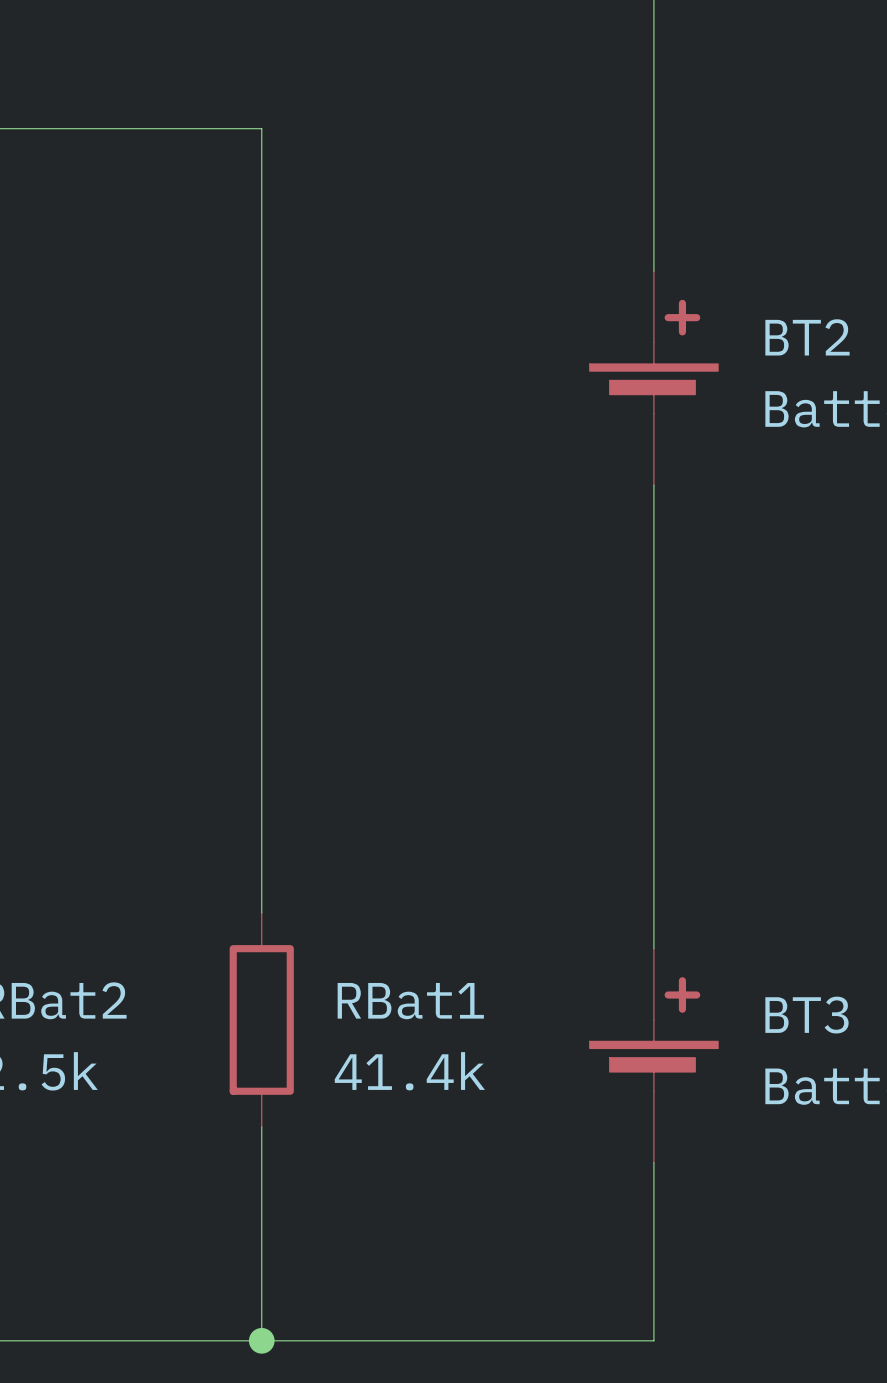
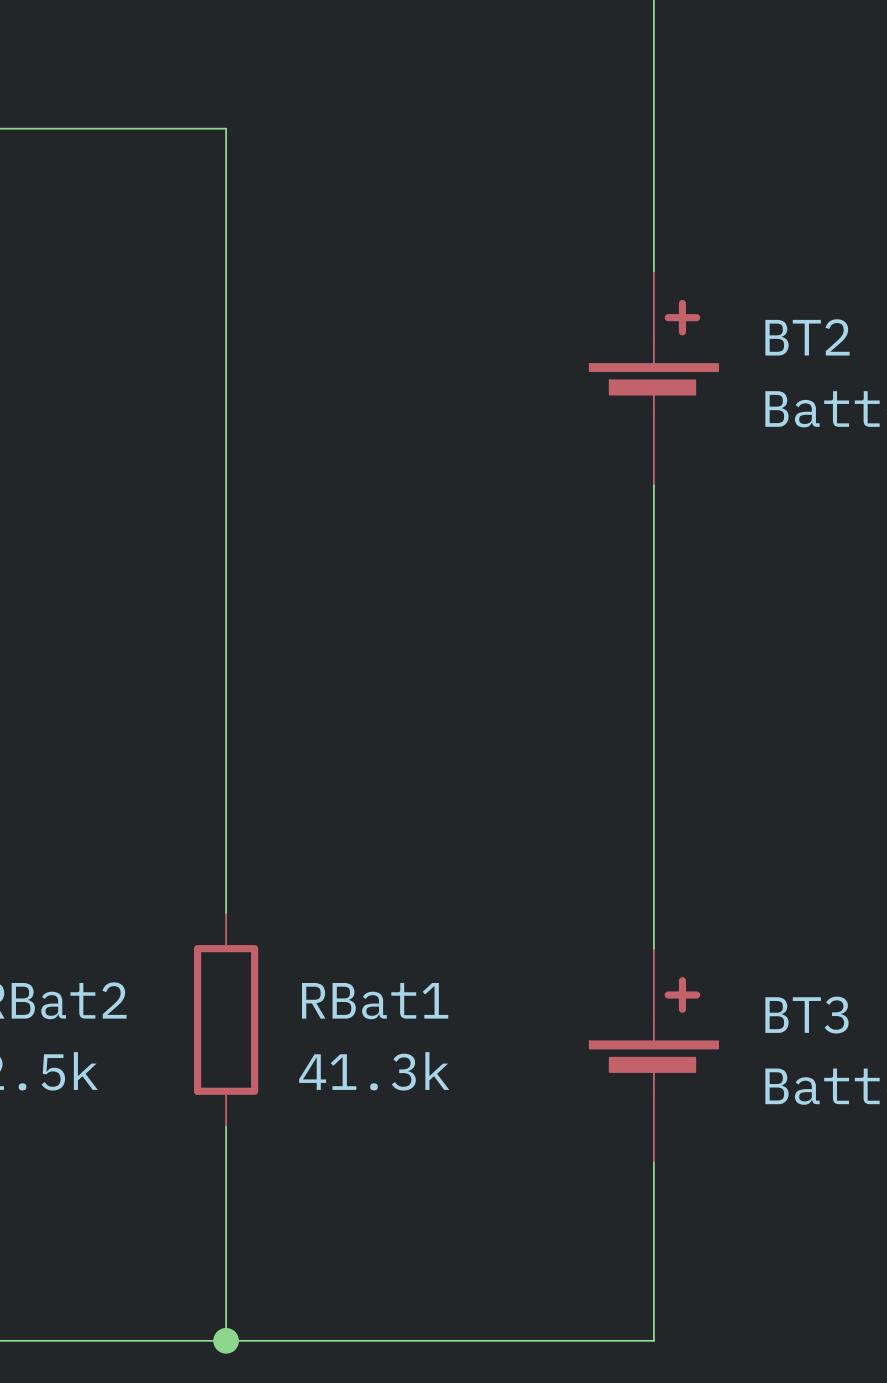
wire: (226, 128) (261, 128) (261, 913) -> (226, 128) (226, 913)
RBat1 position: (261, 1019) -> (226, 1019)
RBat1 value: 41.4k (409, 1071) -> 41.3k (374, 1071)
wire: (261, 1126) (261, 1340) -> (226, 1126) (226, 1340)
junction position: (261, 1340) -> (226, 1340)

